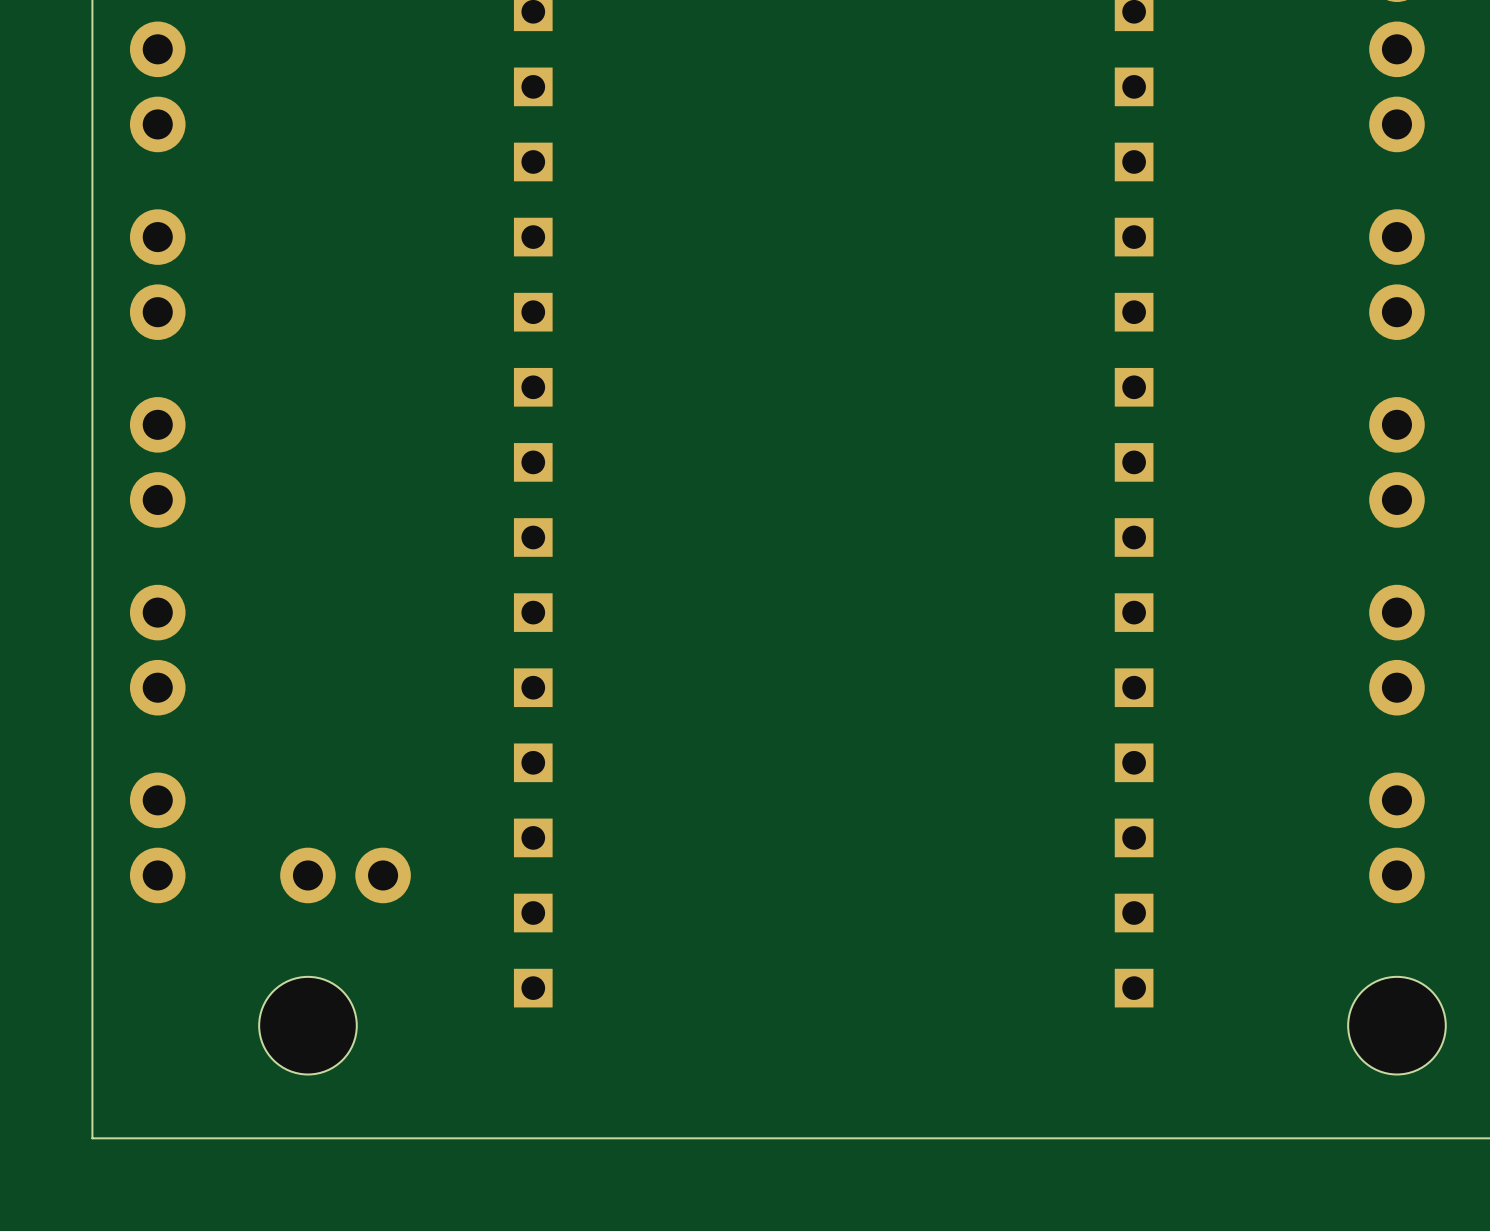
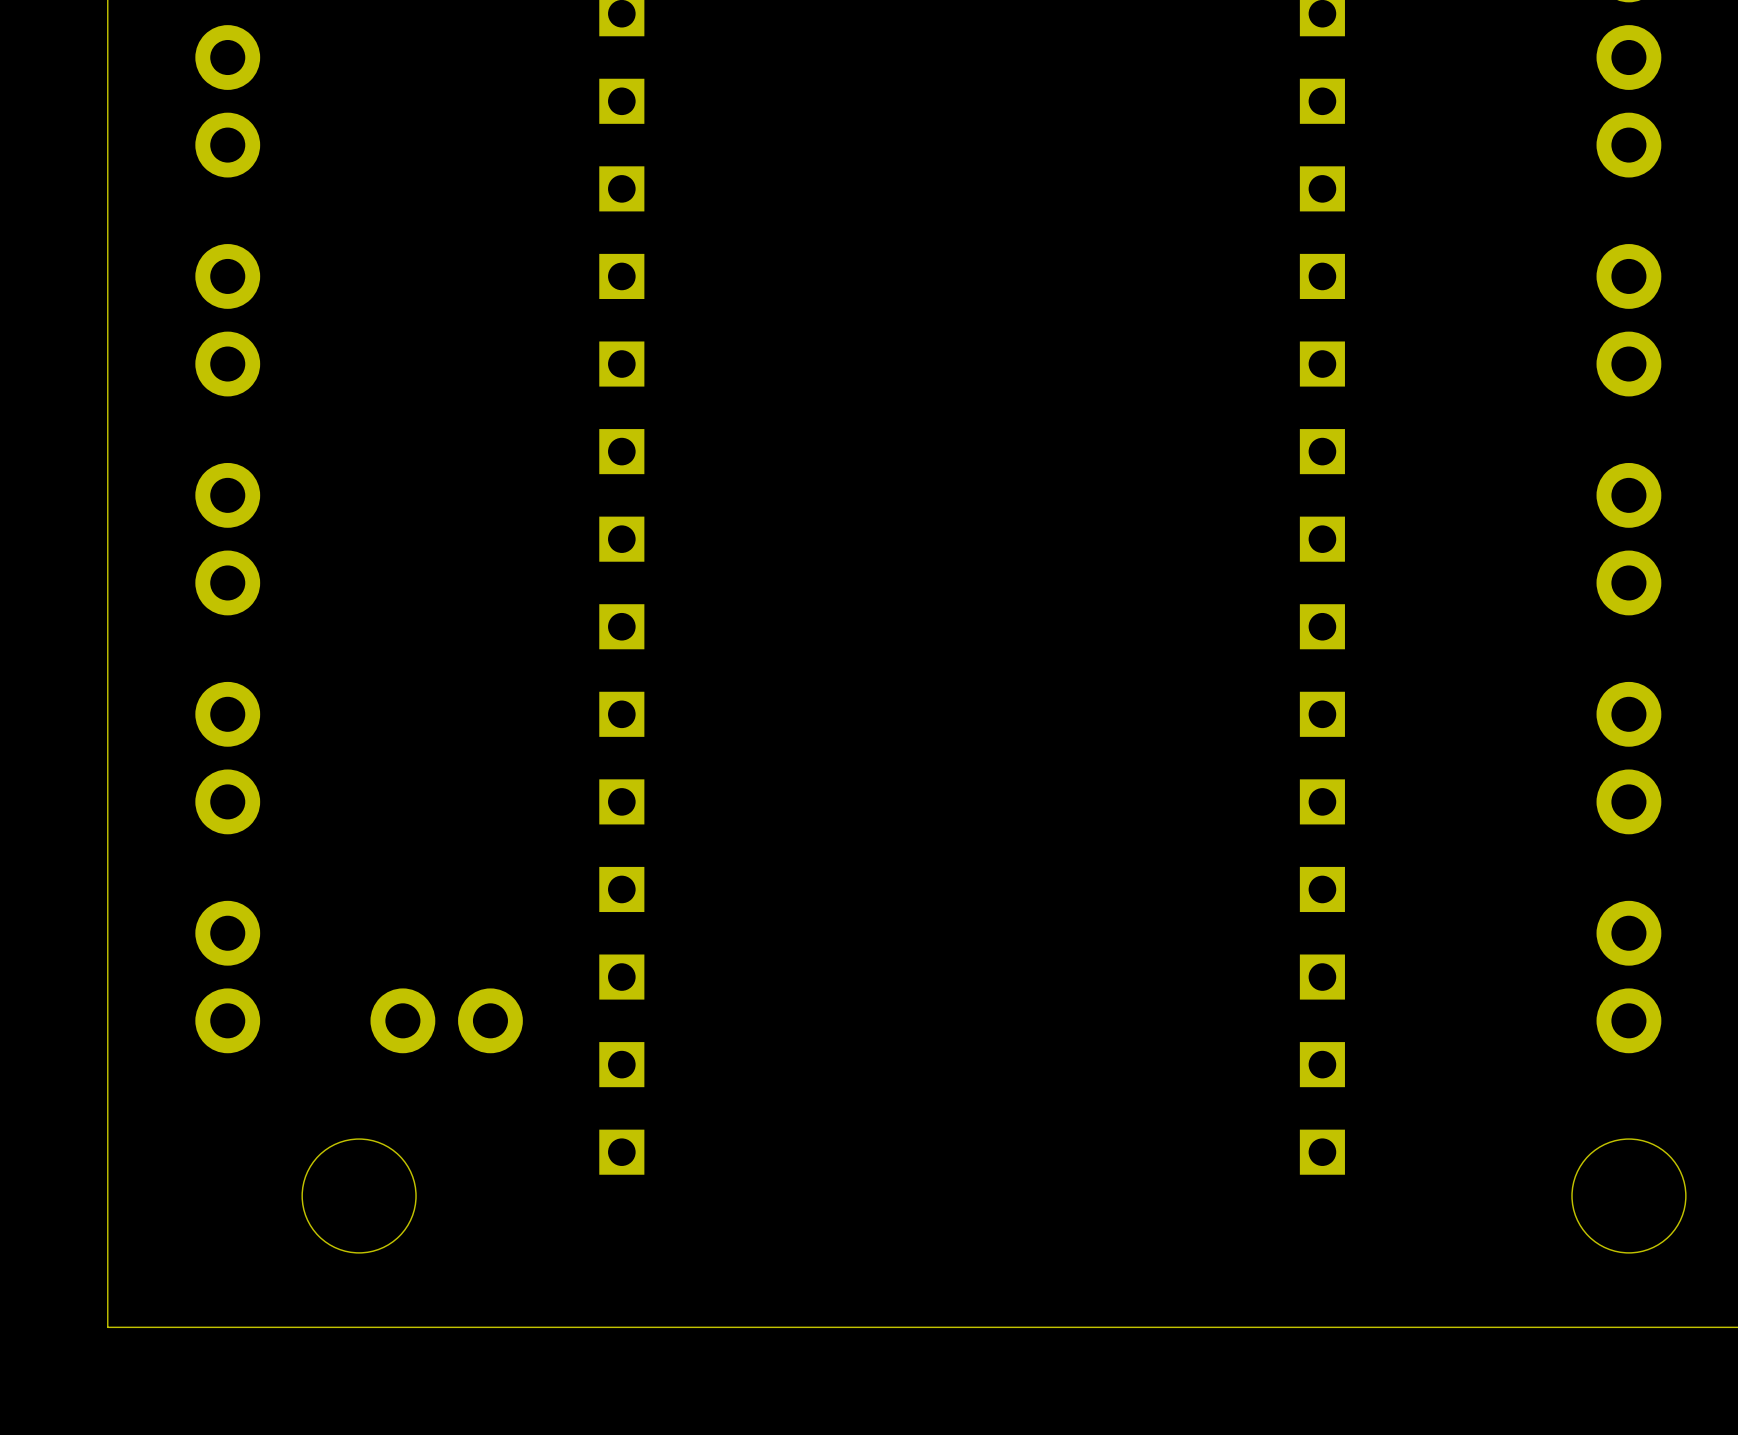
part position: (157, 86) -> (227, 101)
part position: (157, 274) -> (227, 320)
part position: (157, 462) -> (227, 539)
part position: (157, 650) -> (227, 758)
part position: (157, 837) -> (227, 977)
part position: (345, 875) -> (446, 1020)

